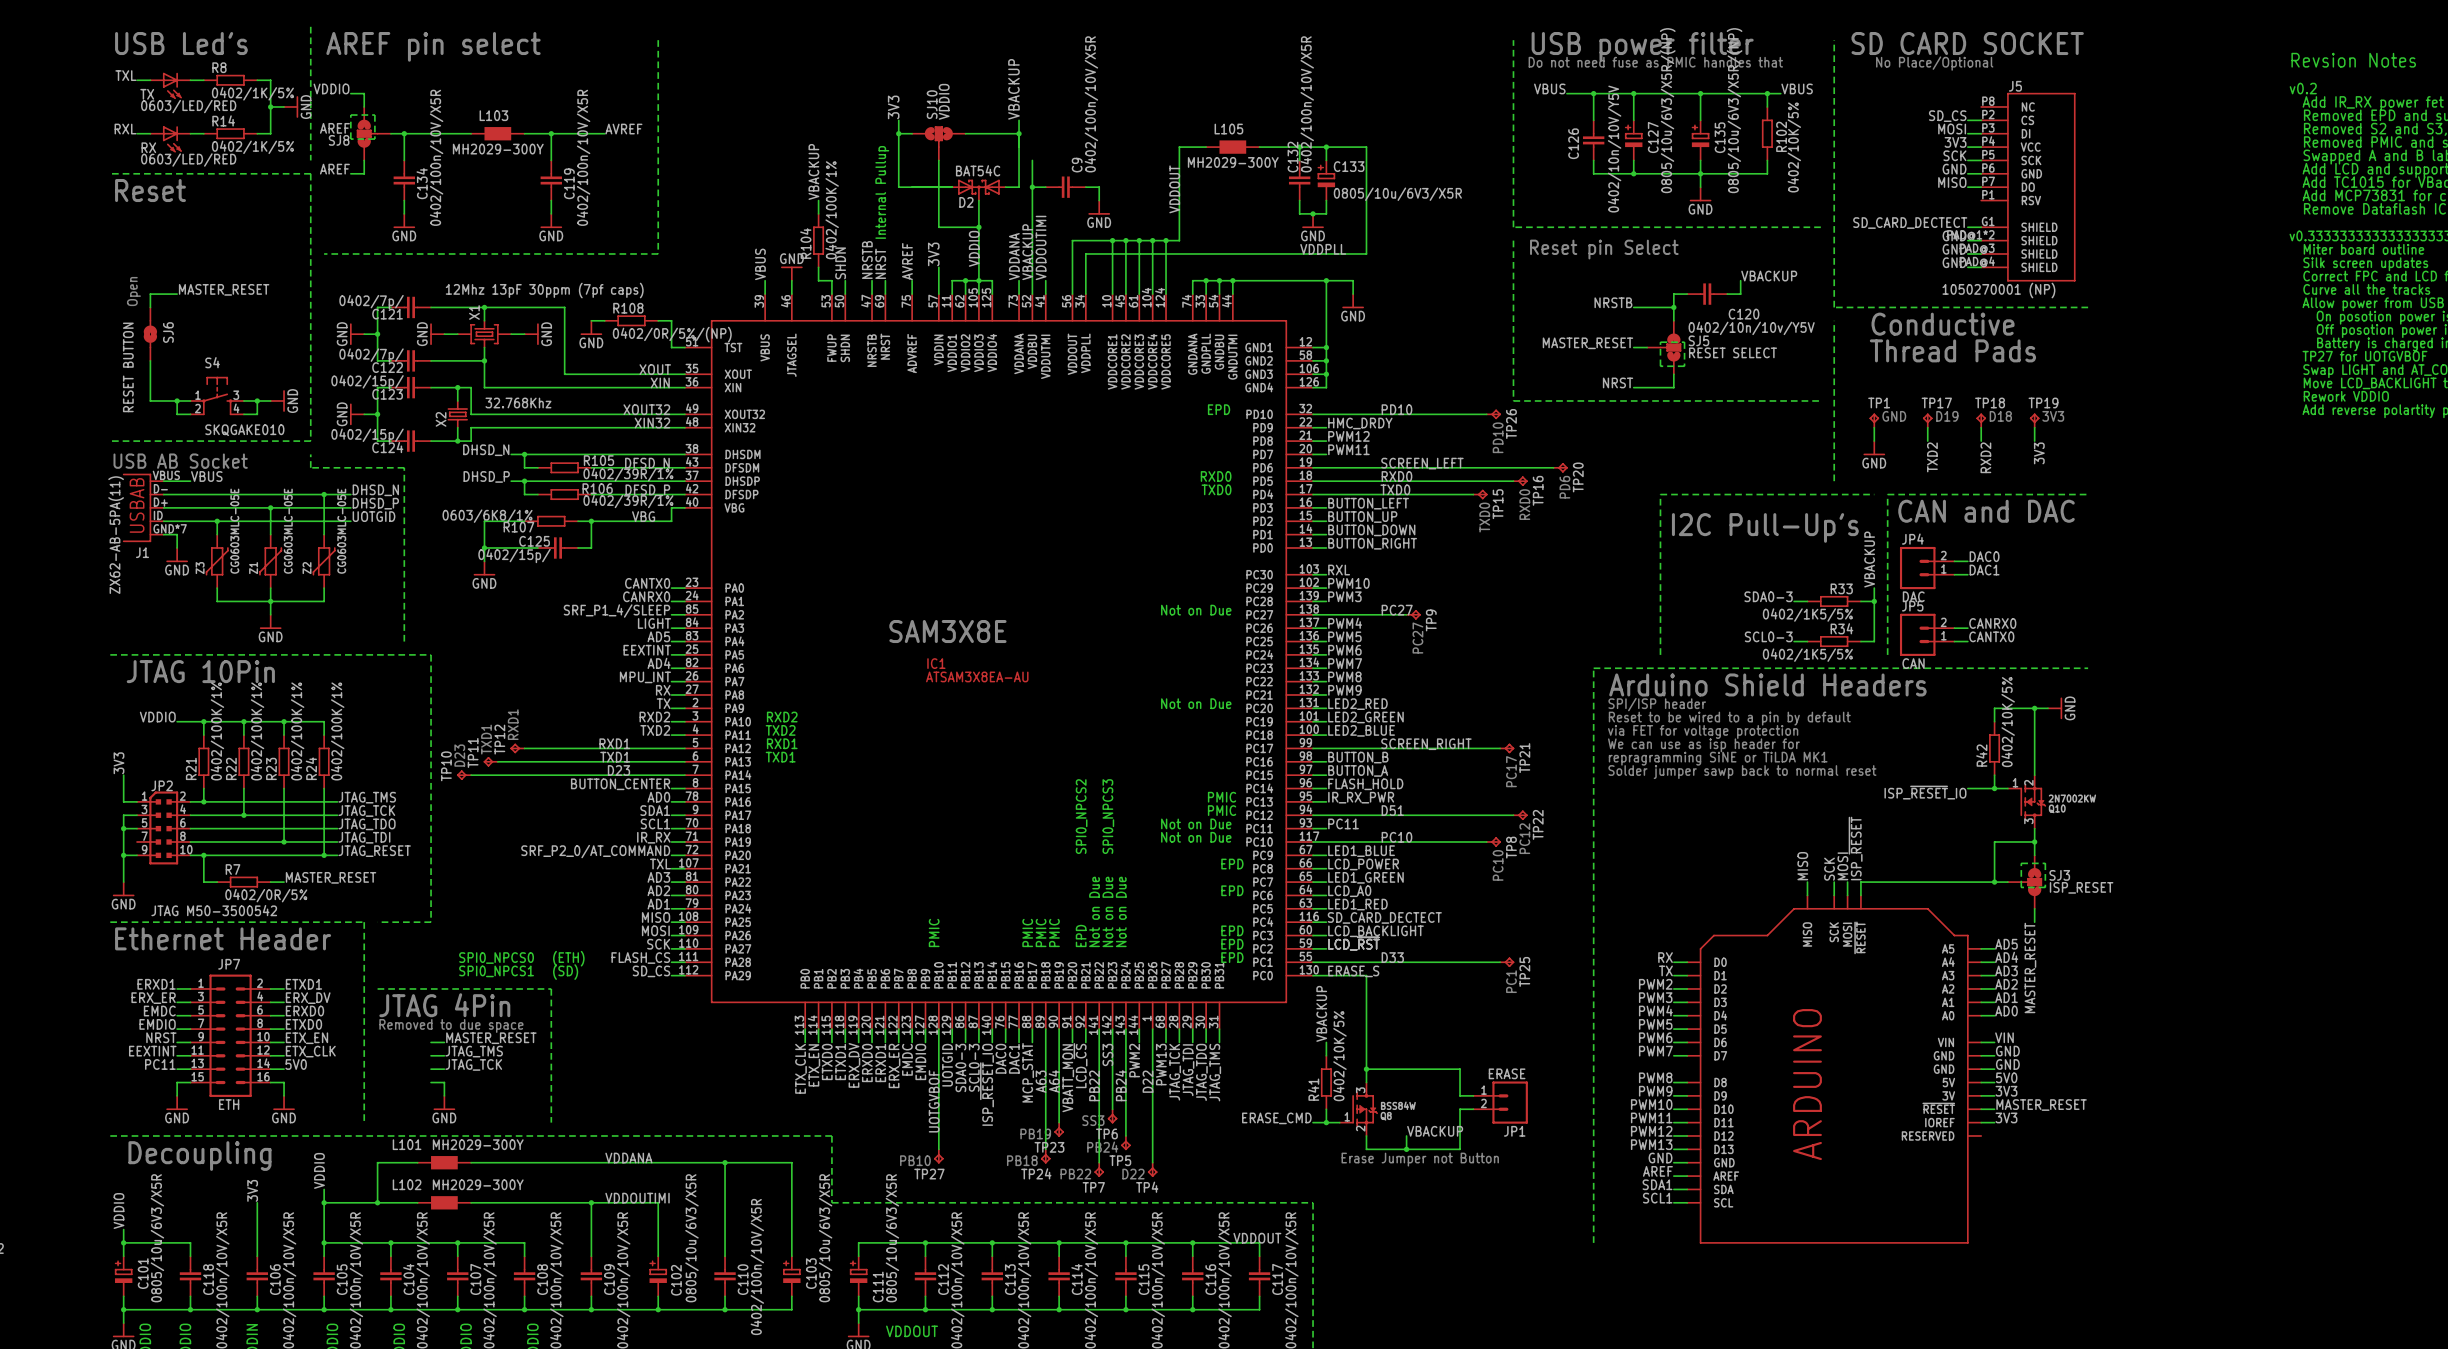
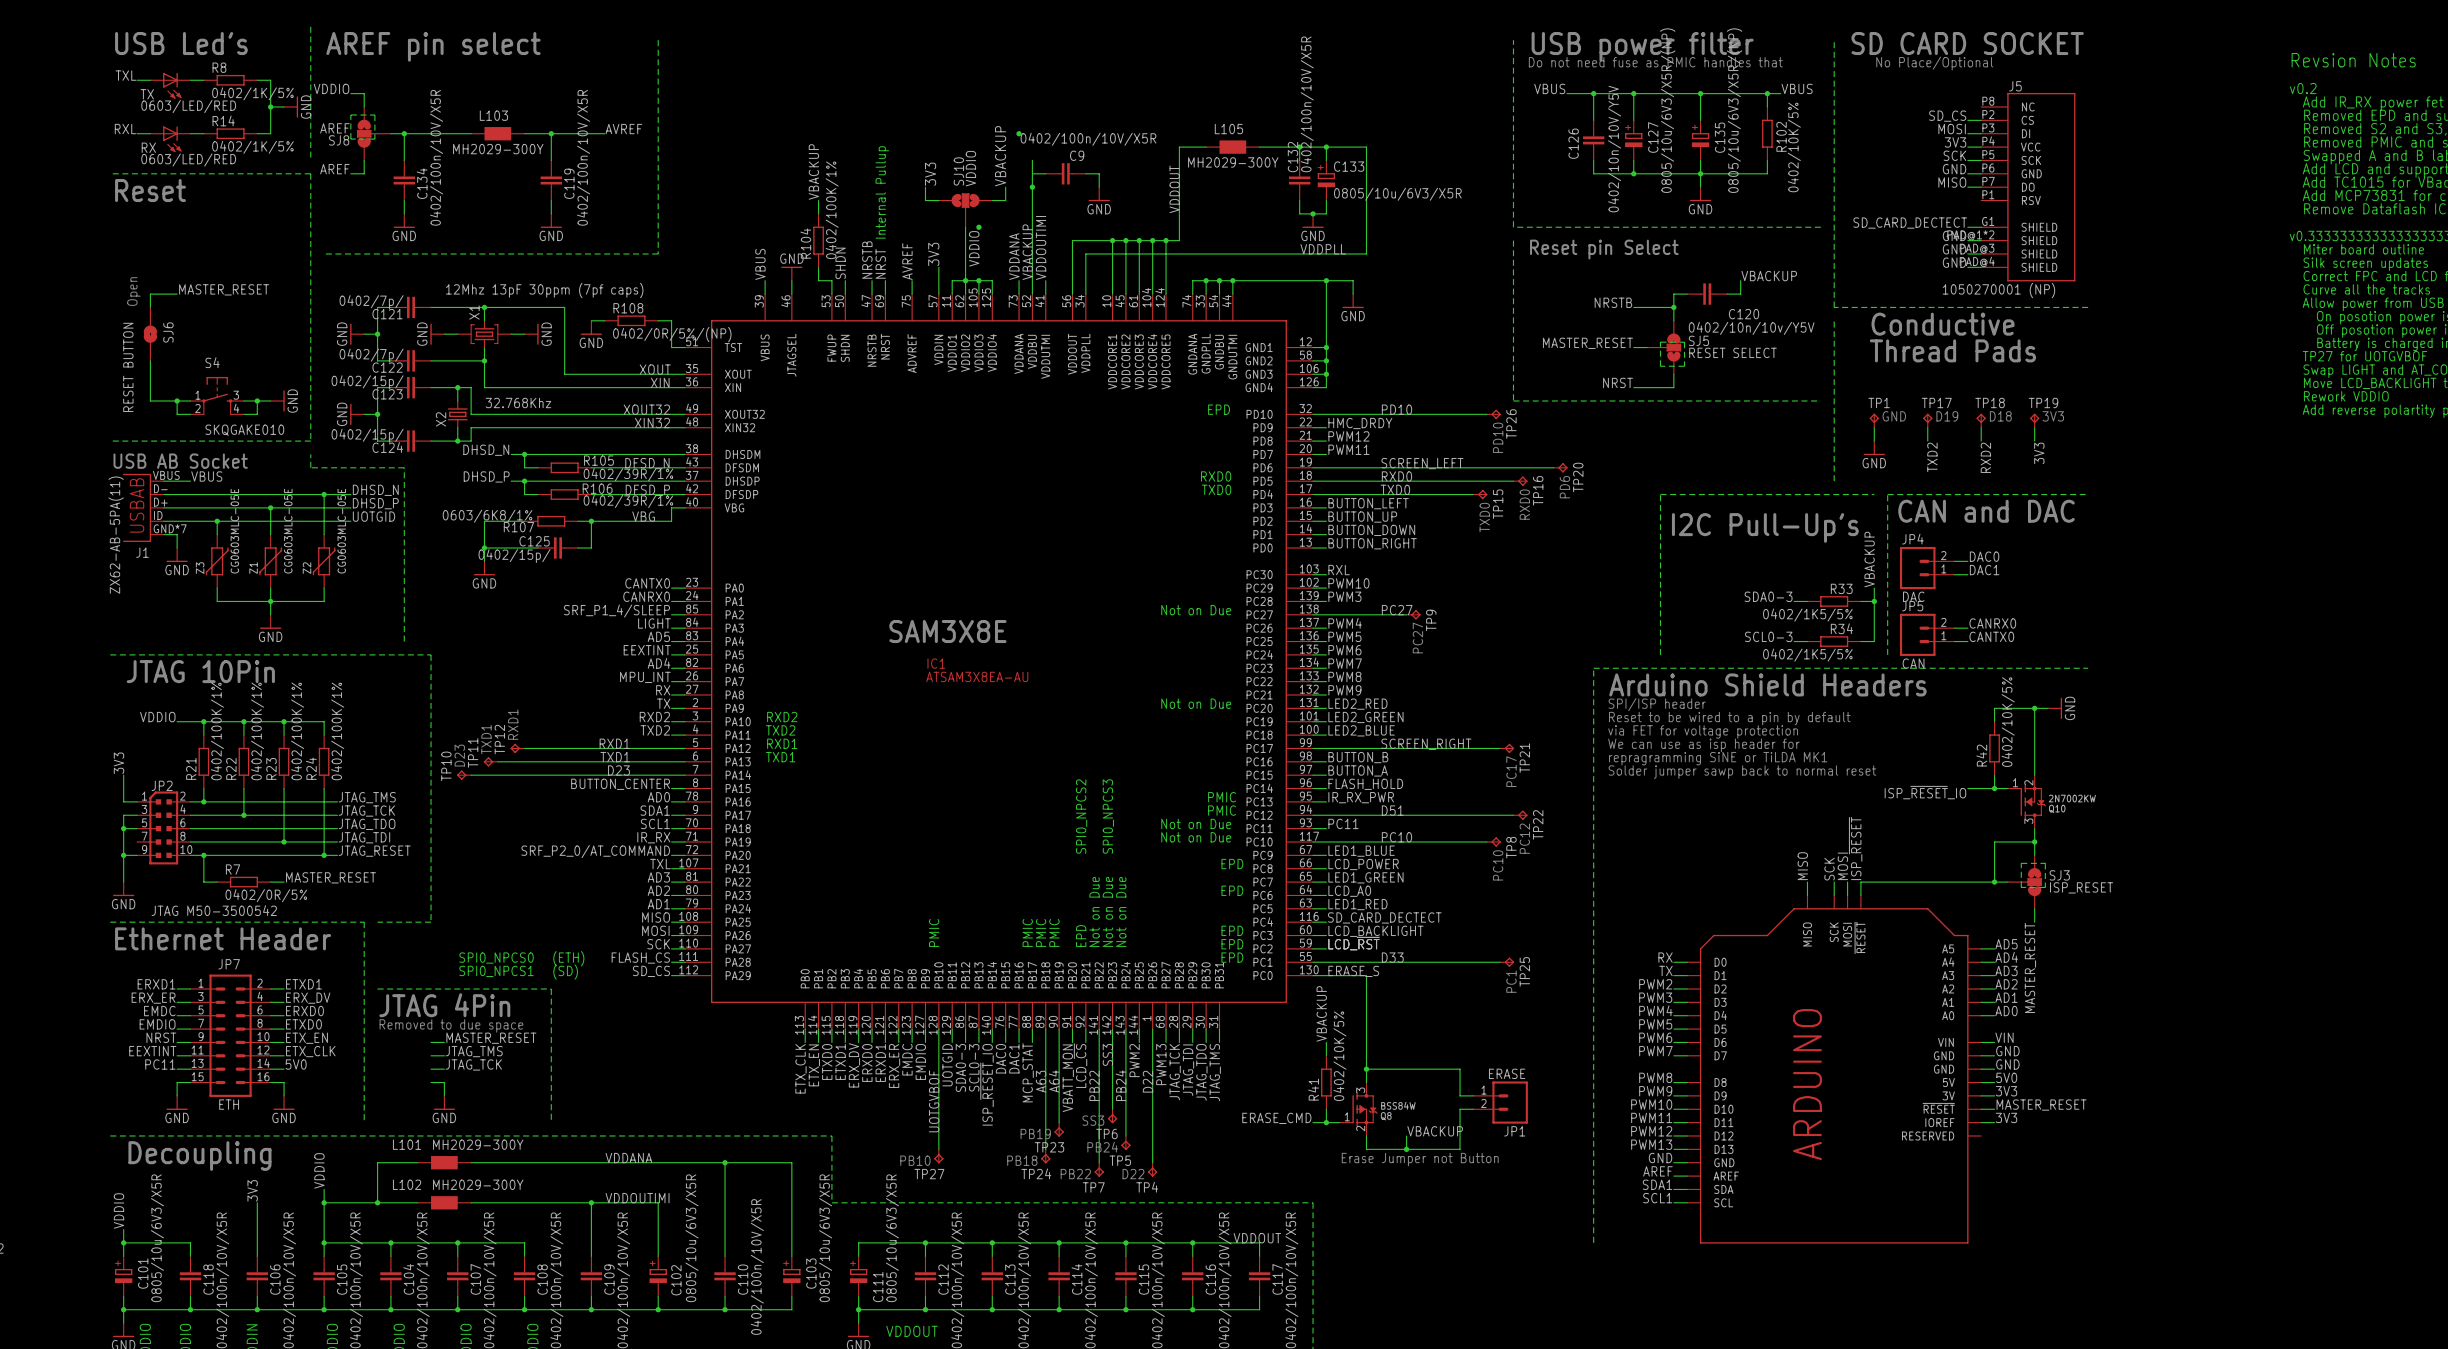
label position: VBACKUP (1013, 89) -> VBACKUP (1000, 156)
C9 value rotation: 0° (1091, 104) -> 90° clockwise (1088, 139)
label position: 3V3 (893, 107) -> 3V3 (930, 174)
wire: (898, 120) (898, 187) (952, 187) -> none
wire: (1019, 120) (1019, 187) (1005, 187) -> (992, 200) (1005, 200) (1005, 187)
wire: (898, 133) (912, 133) -> none
junction: (898, 133) -> none
wire: (965, 133) (1019, 133) -> none
SJ10 position: (938, 143) -> (965, 210)
wire: (938, 160) (938, 227) (978, 227) -> none
C9 name rotation: 0° (1077, 165) -> 90° clockwise (1077, 155)
wire: none -> (925, 187) (925, 200) (938, 200)
wire: (1032, 187) (1045, 187) -> (1032, 173) (1045, 173)
C9 position: (1065, 187) -> (1065, 173)
wire: (1085, 187) (1099, 187) (1099, 200) -> (1085, 173) (1099, 173) (1099, 187)
D2: BAT54C (978, 190) -> none
wire: (978, 200) (978, 280) -> none
power symbol position: GND (1099, 207) -> GND (1099, 194)
wire: none -> (965, 227) (965, 280)

